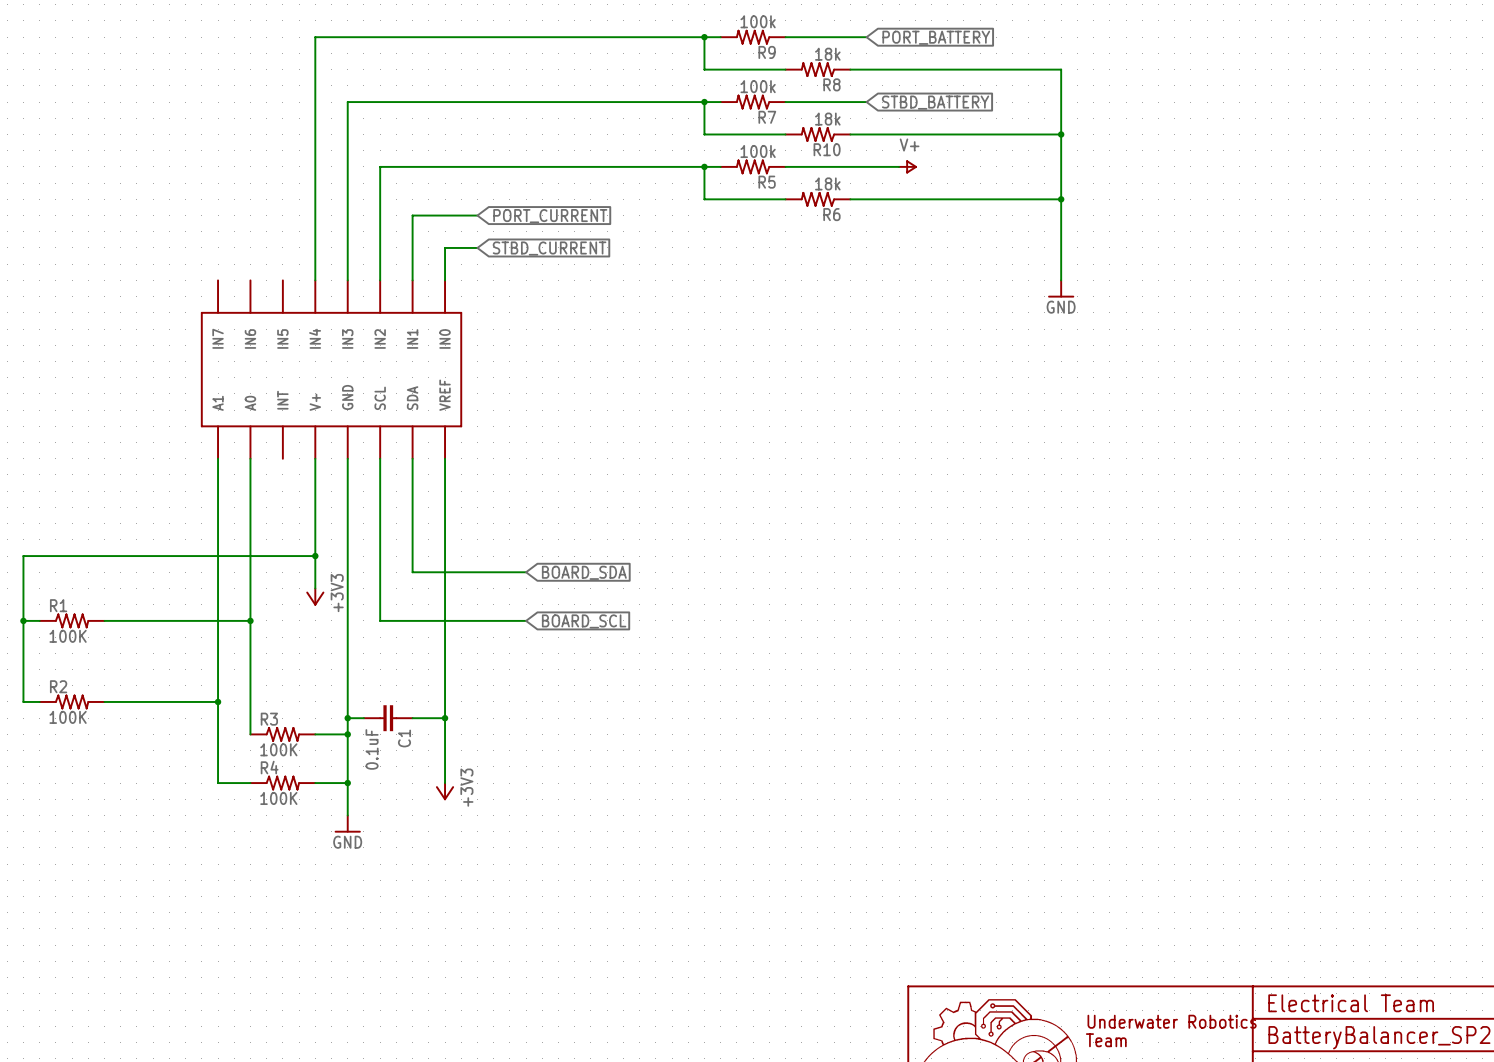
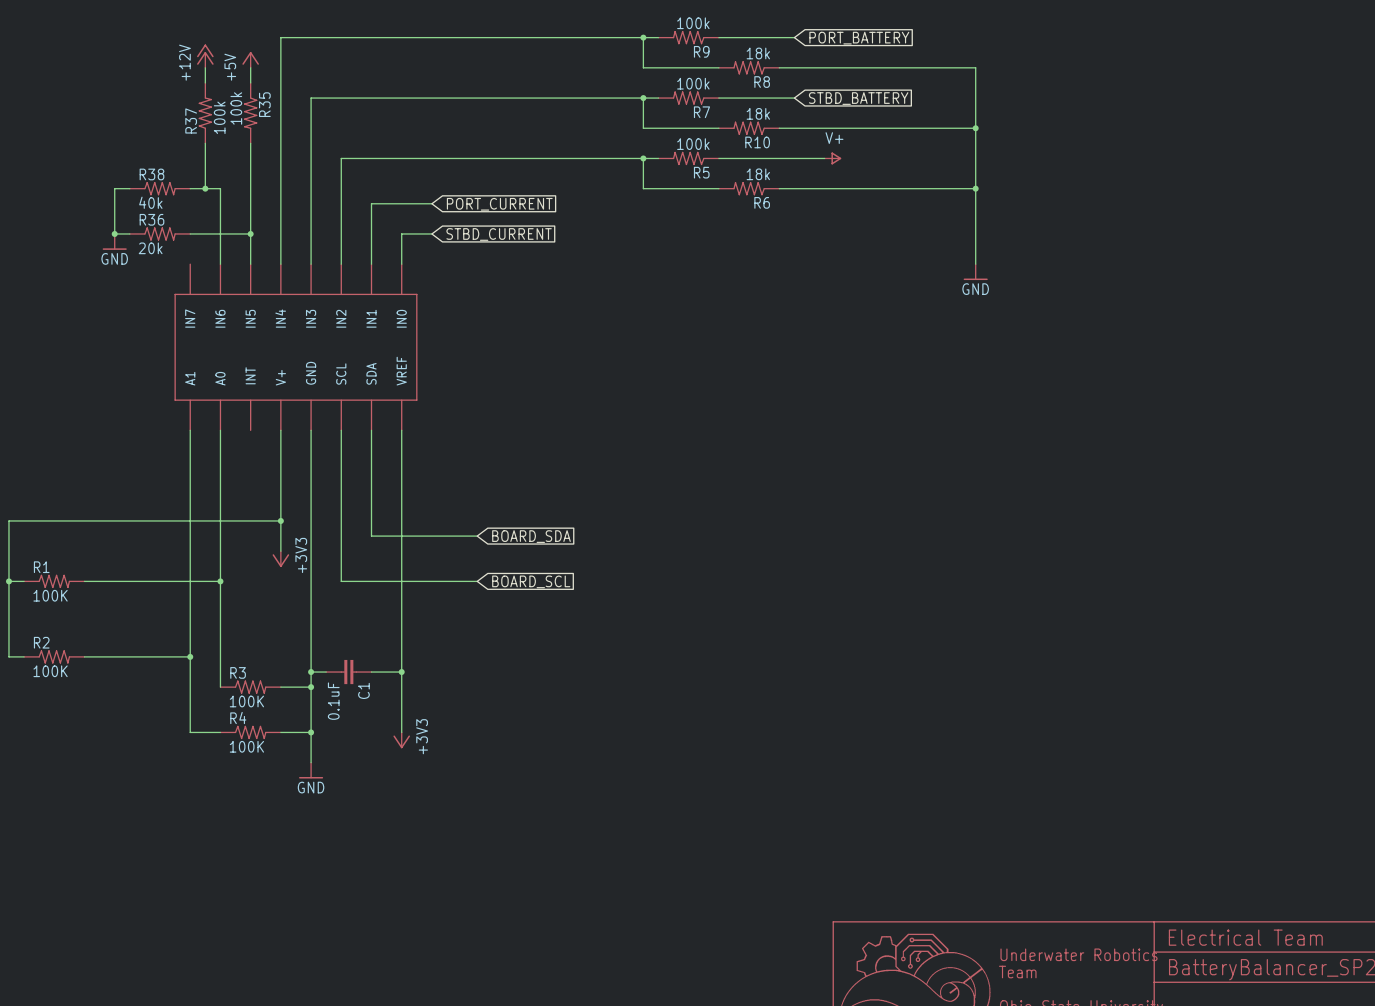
power symbol: none -> +12V (205, 56)
power symbol: none -> +5V (250, 59)
wire: none -> (205, 67) (205, 82)
wire: none -> (250, 67) (250, 82)
R37: none -> 100k (205, 113)
R35: none -> 100k (250, 113)
wire: none -> (205, 143) (205, 188)
wire: none -> (250, 143) (250, 264)
wire: none -> (129, 188) (114, 188) (114, 233) (129, 233)
R38: none -> 40k (160, 188)
wire: none -> (190, 188) (220, 188) (220, 264)
junction: none -> (205, 188)
junction: none -> (114, 233)
R36: none -> 20k (160, 233)
wire: none -> (190, 233) (250, 233)
junction: none -> (250, 233)
power symbol: none -> GND (114, 241)

